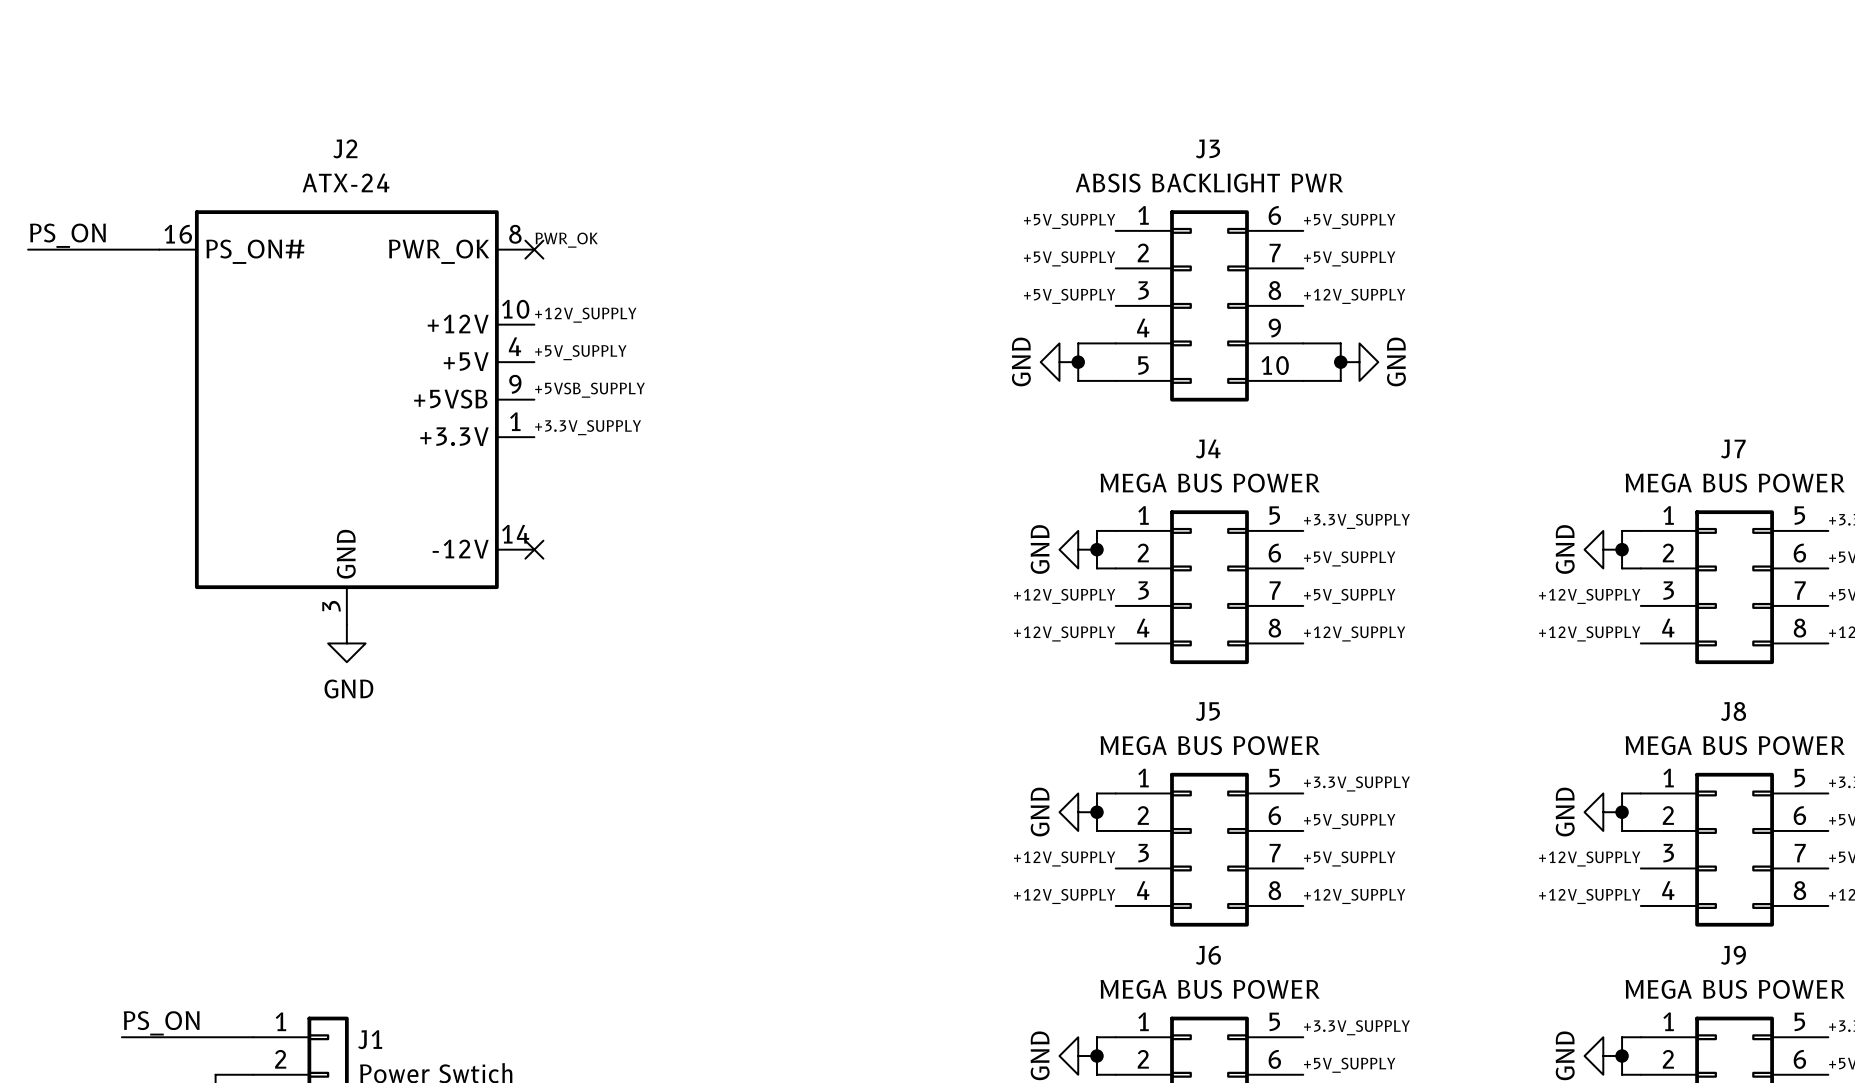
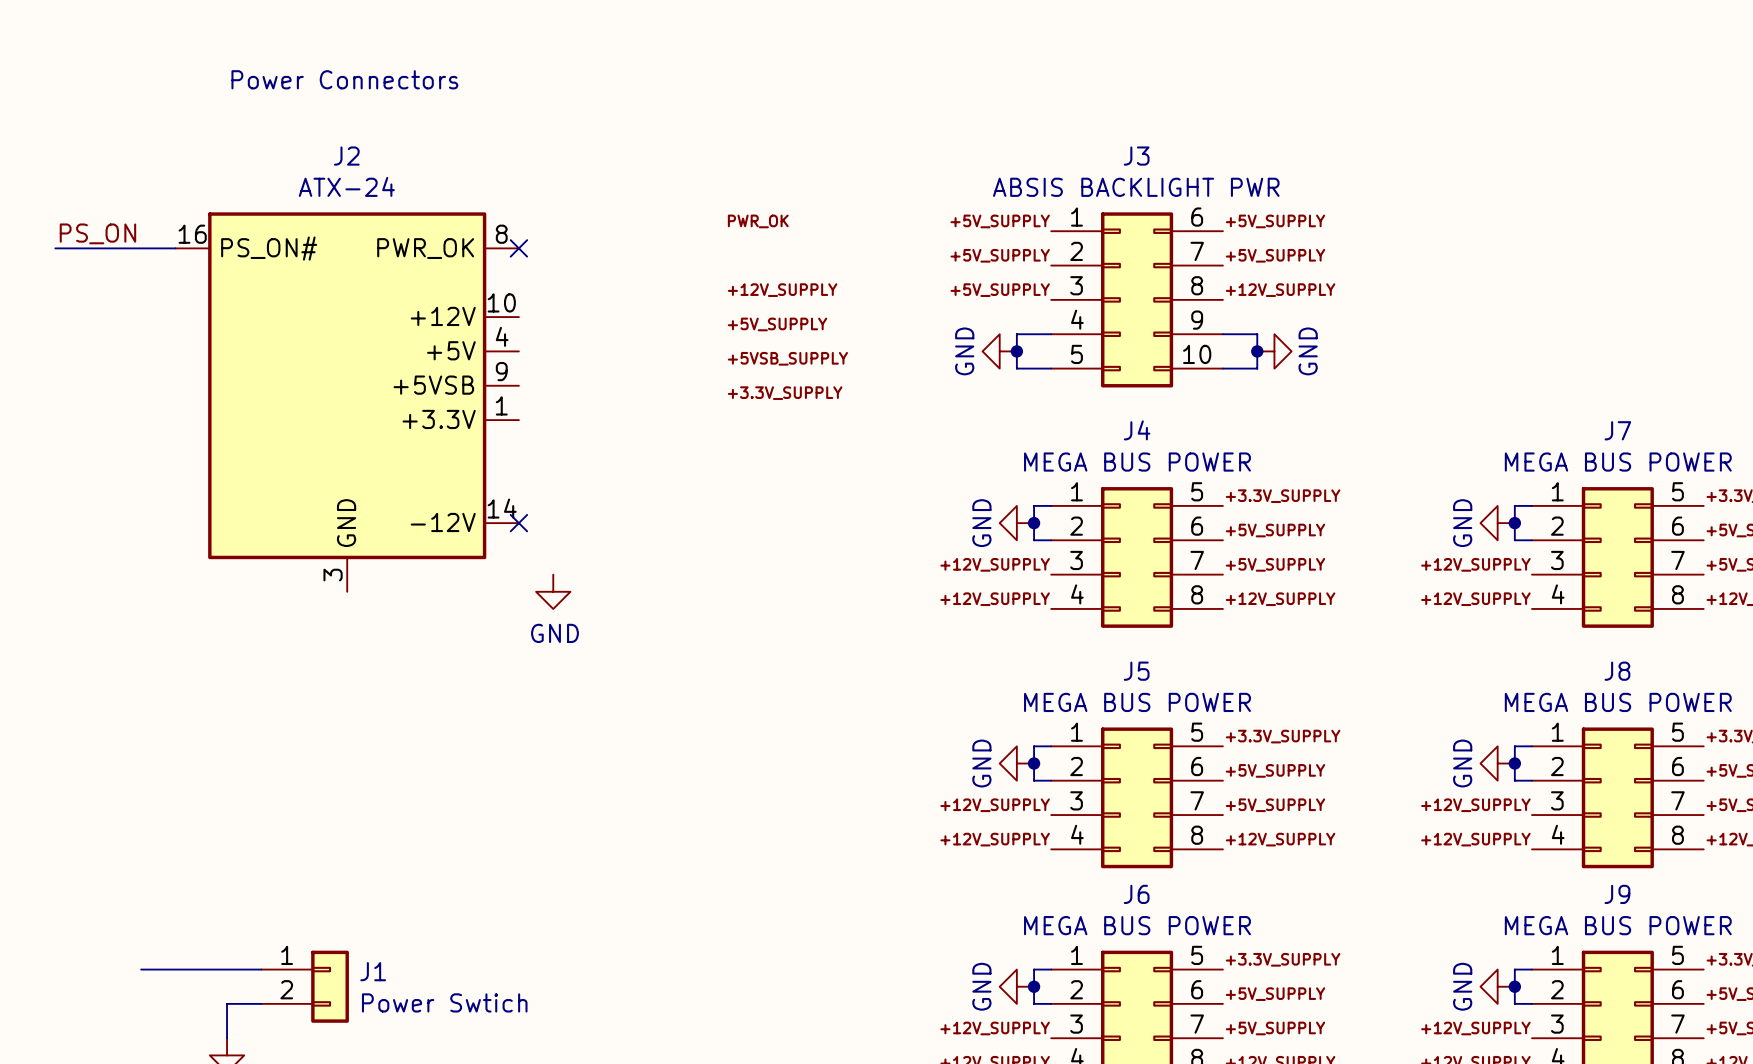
text: none -> Power Connectors (344, 79)
label position: PWR_OK (566, 240) -> PWR_OK (758, 221)
label position: +12V_SUPPLY (585, 315) -> +12V_SUPPLY (782, 290)
label position: +5V_SUPPLY (580, 352) -> +5V_SUPPLY (777, 324)
label position: +5VSB_SUPPLY (590, 390) -> +5VSB_SUPPLY (787, 358)
label position: +3.3V_SUPPLY (588, 427) -> +3.3V_SUPPLY (785, 393)
power symbol position: GND (346, 643) -> GND (553, 591)
label: PS_ON (161, 1023) -> none

